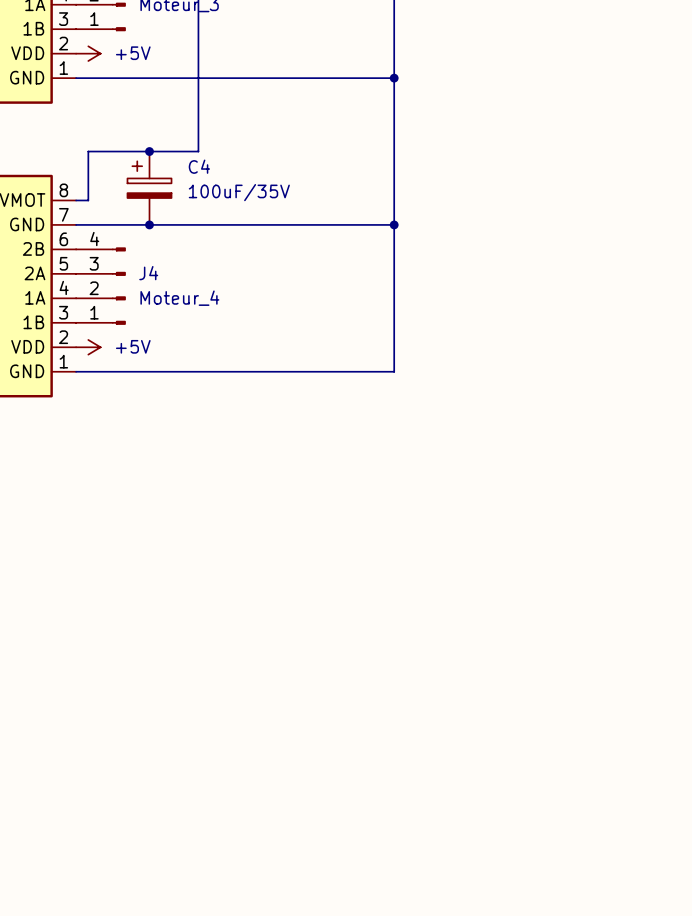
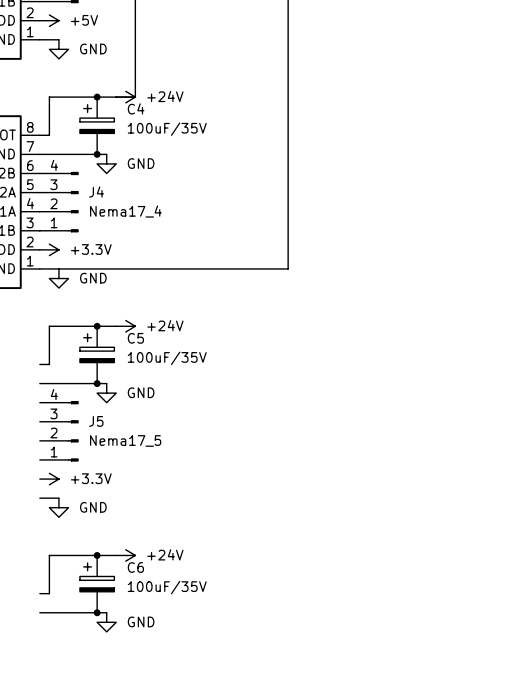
wire: (100, 78) (394, 78) -> none
junction: (394, 78) -> none
power symbol: none -> GND (58, 49)
power symbol: none -> +24V (125, 97)
wire: (161, 224) (394, 224) -> none
junction: (394, 224) -> none
power symbol: none -> GND (106, 163)
J4 value: Moteur_4 (179, 298) -> Nema17_4 (125, 211)
power symbol: +5V (88, 347) -> +3.3V (49, 249)
power symbol: none -> GND (58, 278)
junction: none -> (97, 326)
wire: none -> (116, 326) (49, 326) (49, 364) (39, 364)
power symbol: none -> +24V (125, 326)
C5: none -> 100uF/35V (97, 354)
wire: none -> (39, 383) (106, 383)
junction: none -> (97, 383)
power symbol: none -> GND (106, 393)
J5: none -> Nema17_5 (59, 431)
power symbol: none -> +3.3V (49, 479)
wire: none -> (39, 498) (58, 498)
power symbol: none -> GND (58, 507)
junction: none -> (97, 555)
wire: none -> (116, 555) (49, 555) (49, 593) (39, 593)
power symbol: none -> +24V (125, 555)
C6: none -> 100uF/35V (97, 584)
wire: none -> (39, 612) (106, 612)
junction: none -> (97, 612)
power symbol: none -> GND (106, 622)

